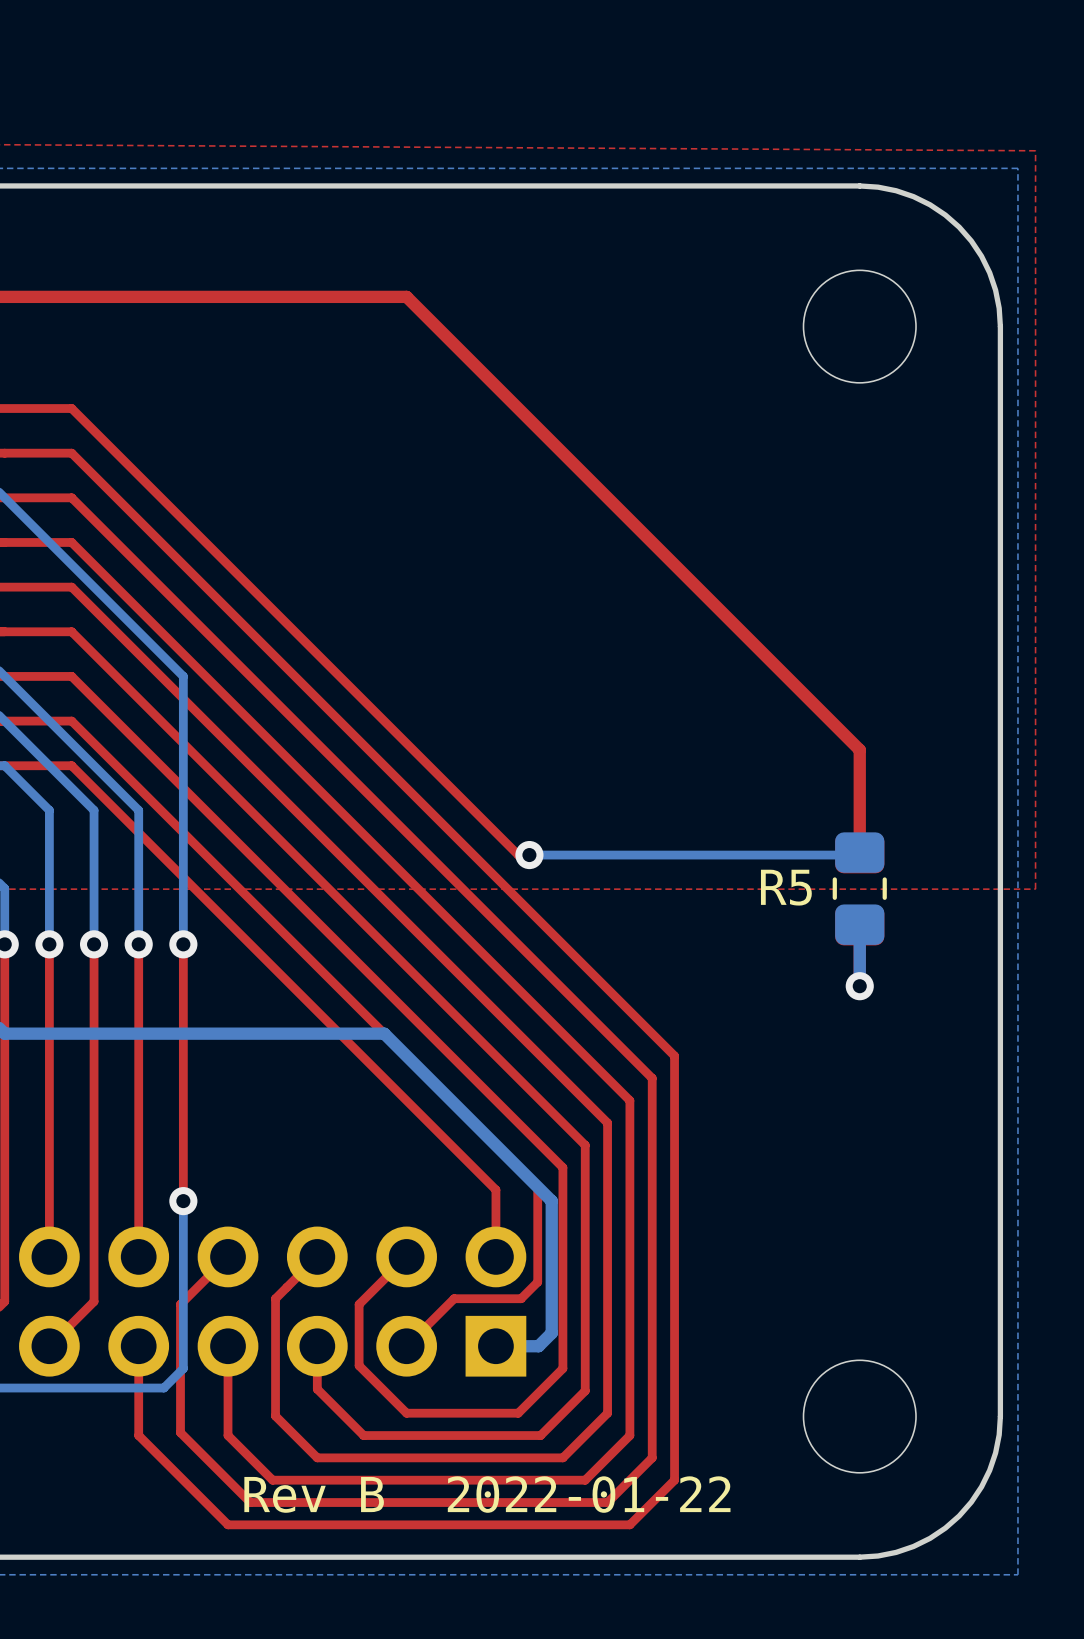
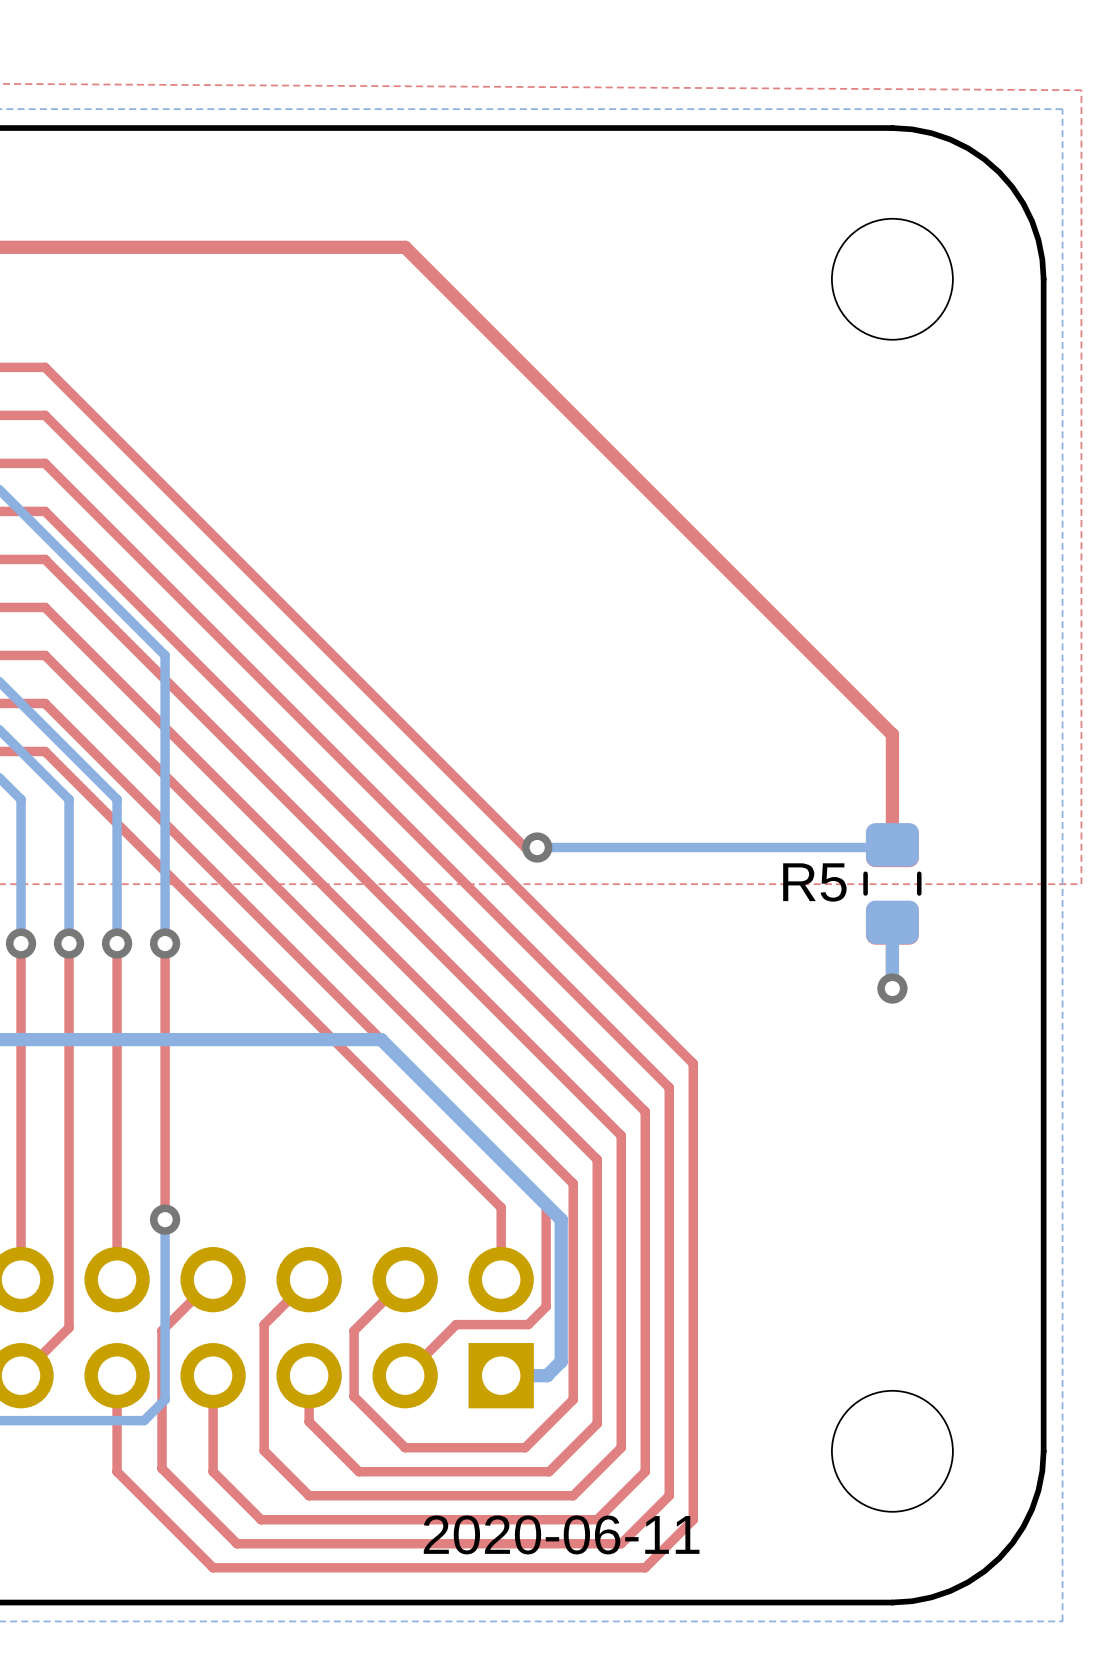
text: Rev B 2022-01-22 (487, 1494) -> none
text: none -> 2020-06-11 (561, 1534)

